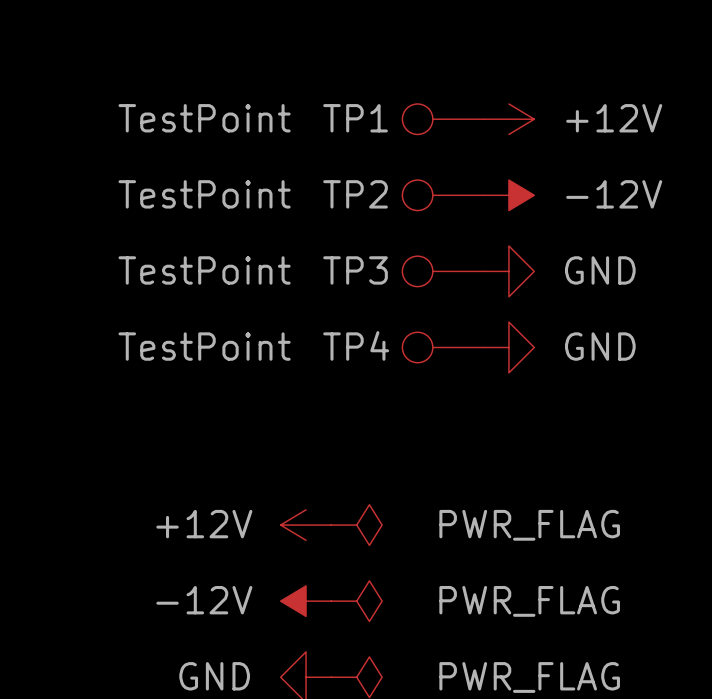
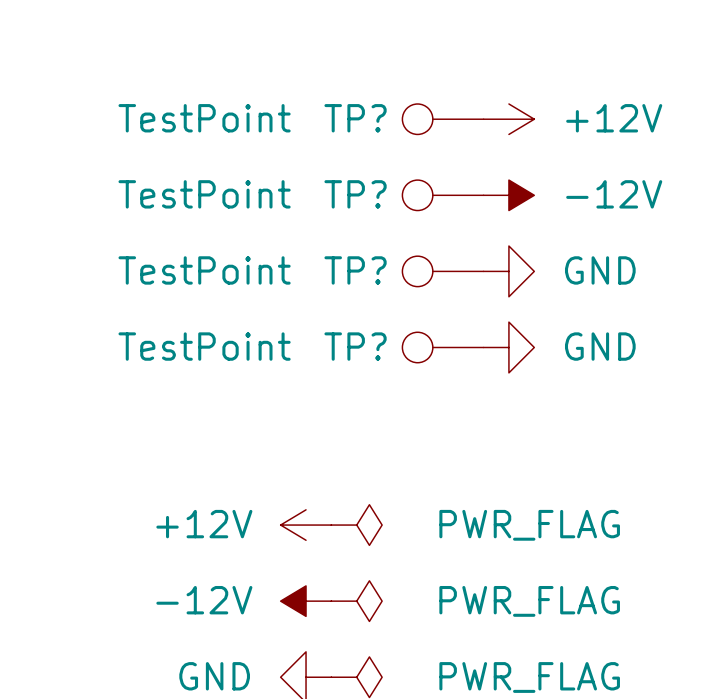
TP1 name: TP1 (355, 118) -> TP? (355, 118)
TP2 name: TP2 (355, 194) -> TP? (355, 194)
TP3 name: TP3 (355, 270) -> TP? (355, 270)
TP4 name: TP4 (356, 345) -> TP? (355, 346)

